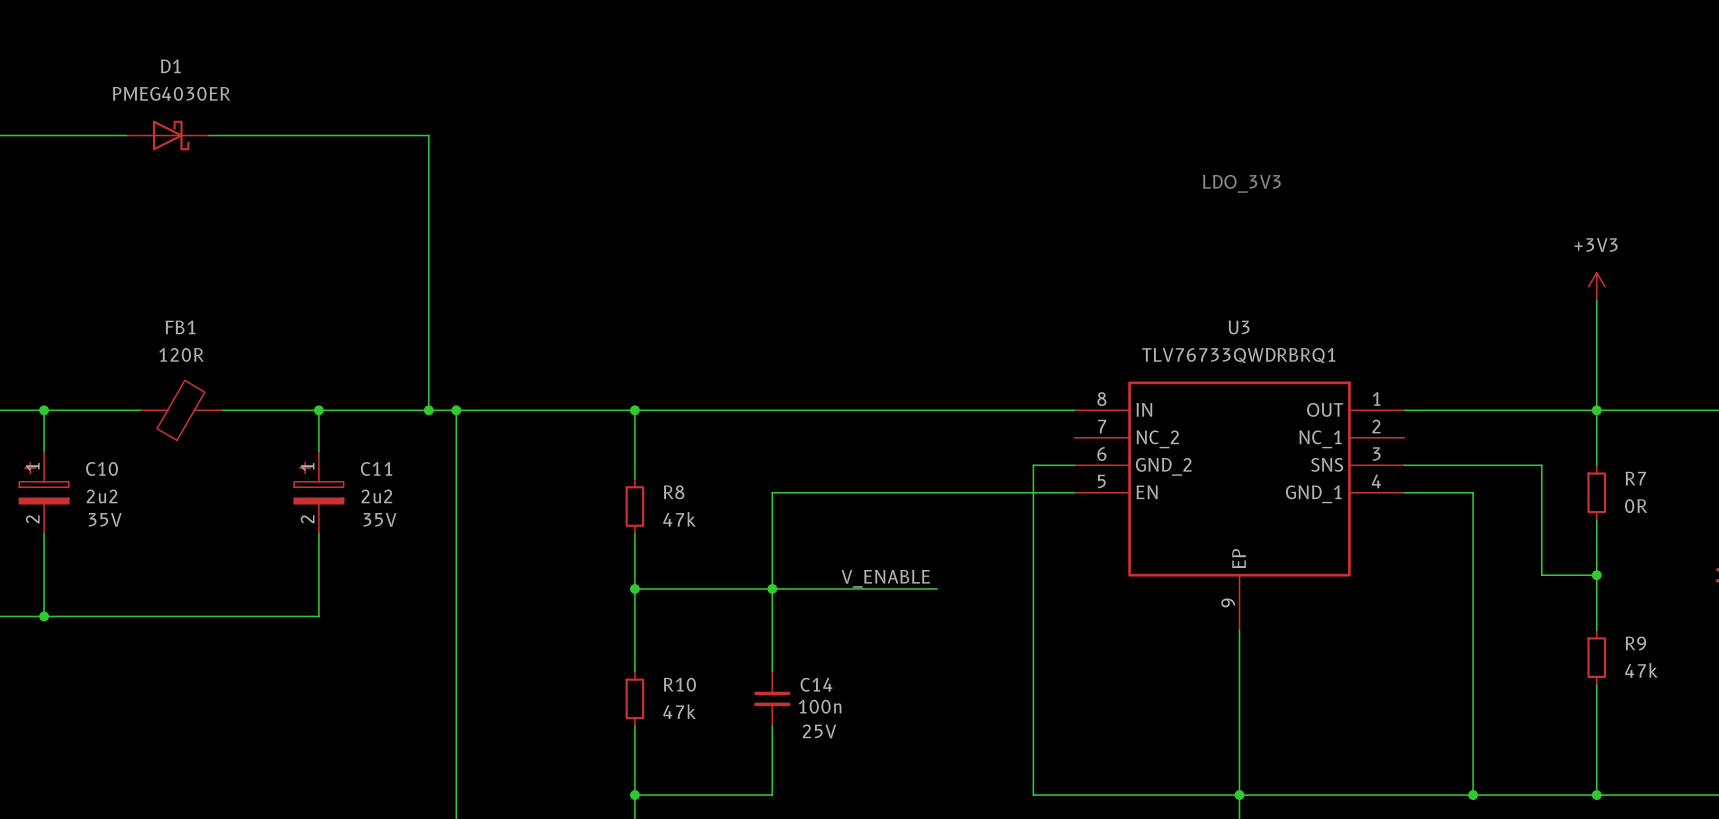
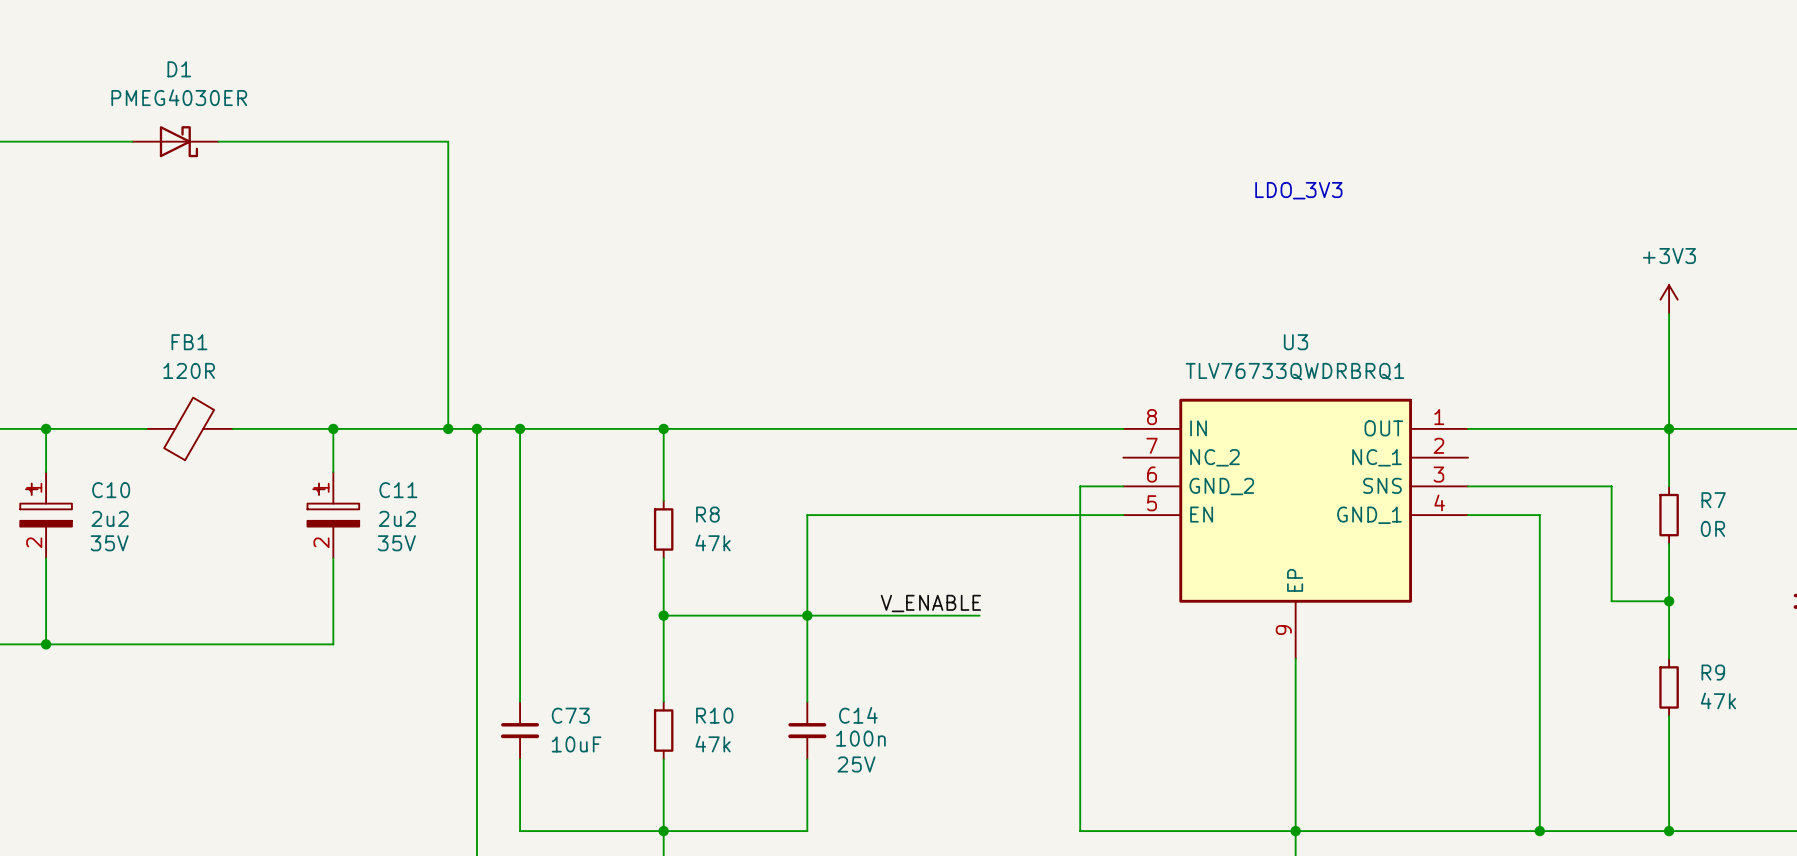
wire: none -> (520, 428) (520, 701)
junction: none -> (520, 428)
C73: none -> 10uF (520, 730)
wire: none -> (520, 759) (520, 831) (663, 831)

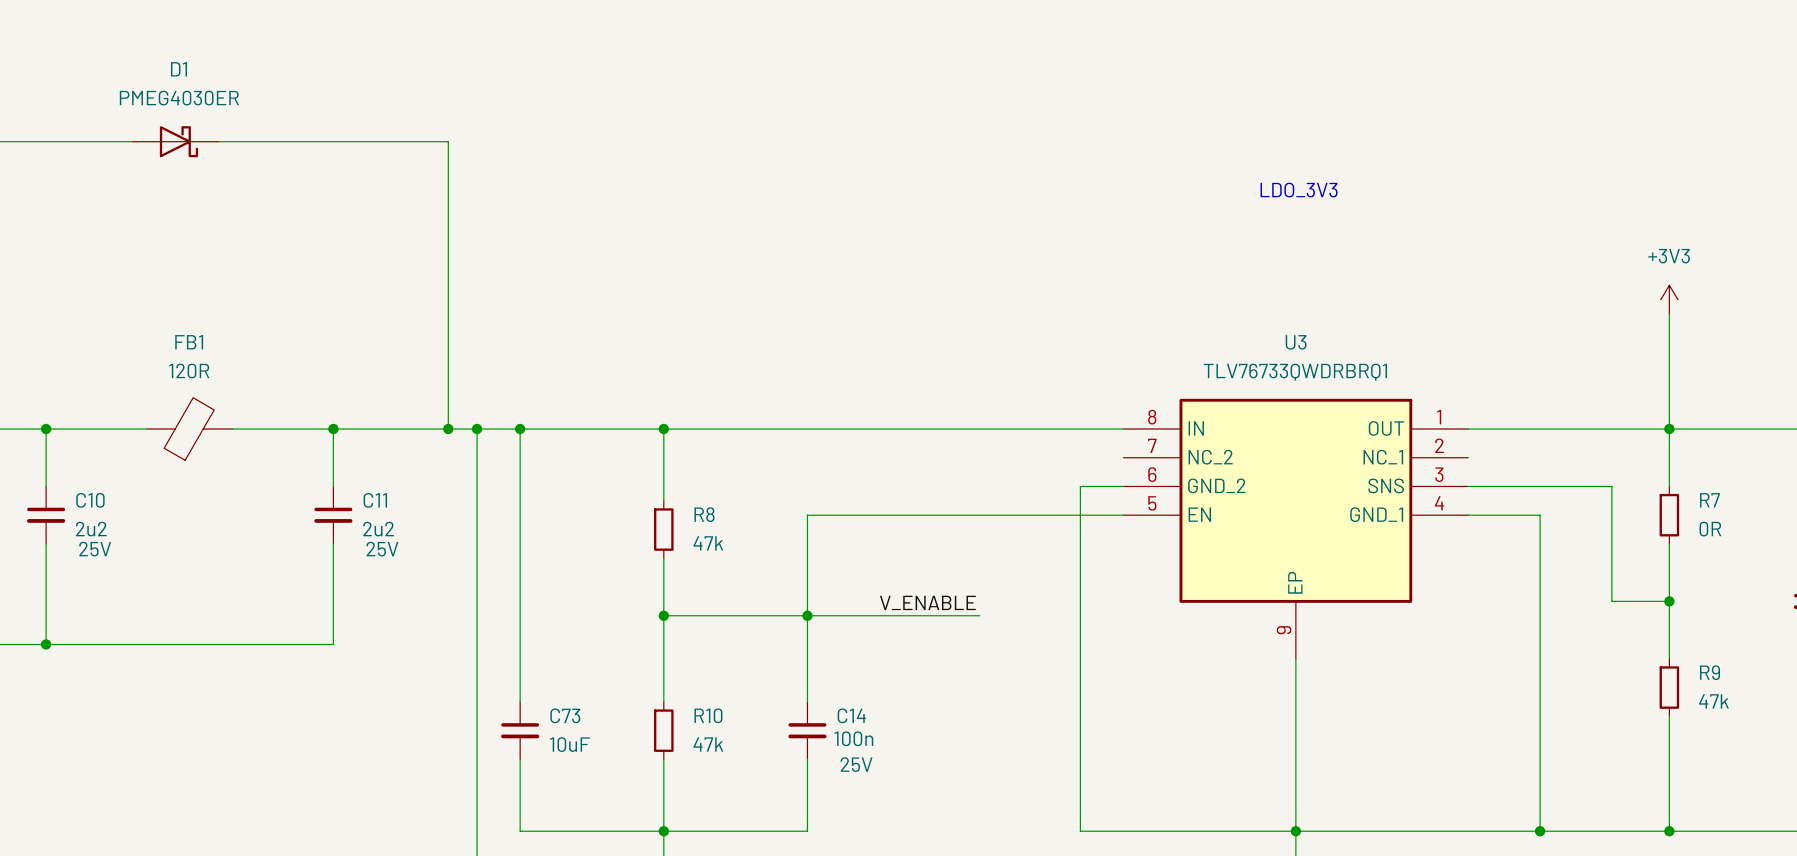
C10 symbol: [20, 472, 72, 559] -> [26, 486, 66, 544]
C11 symbol: [307, 472, 360, 559] -> [314, 486, 353, 544]
C10 text: 35V (109, 543) -> 25V (95, 549)
C11 text: 35V (396, 543) -> 25V (382, 549)

